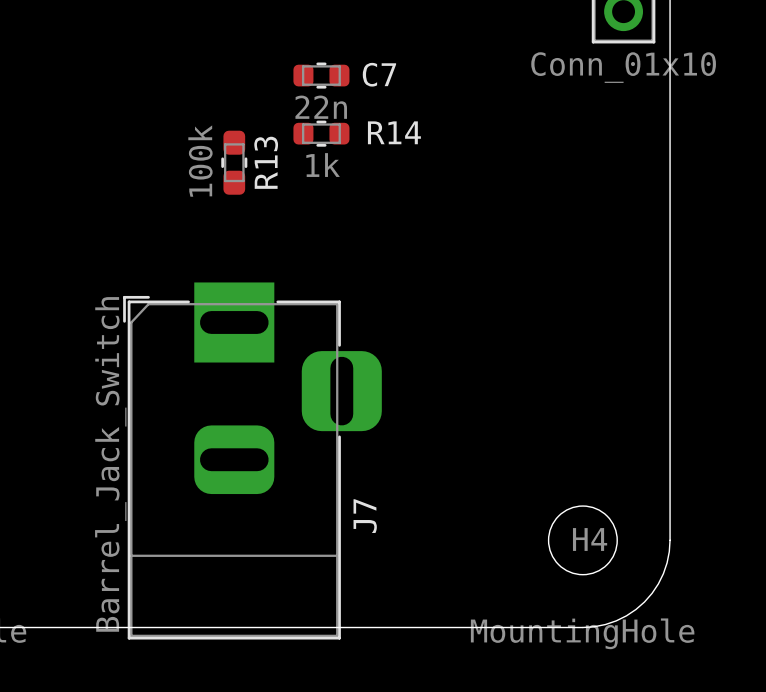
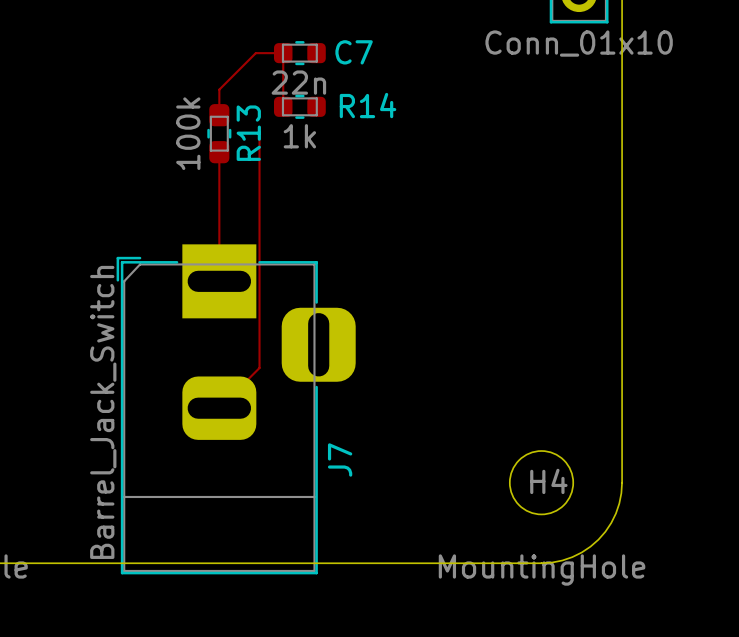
top track: none -> (283, 106) (283, 53) (255, 53) (219, 89) (219, 115)
top track: none -> (259, 133) (259, 368) (219, 408)
top track: none -> (219, 152) (219, 281)

